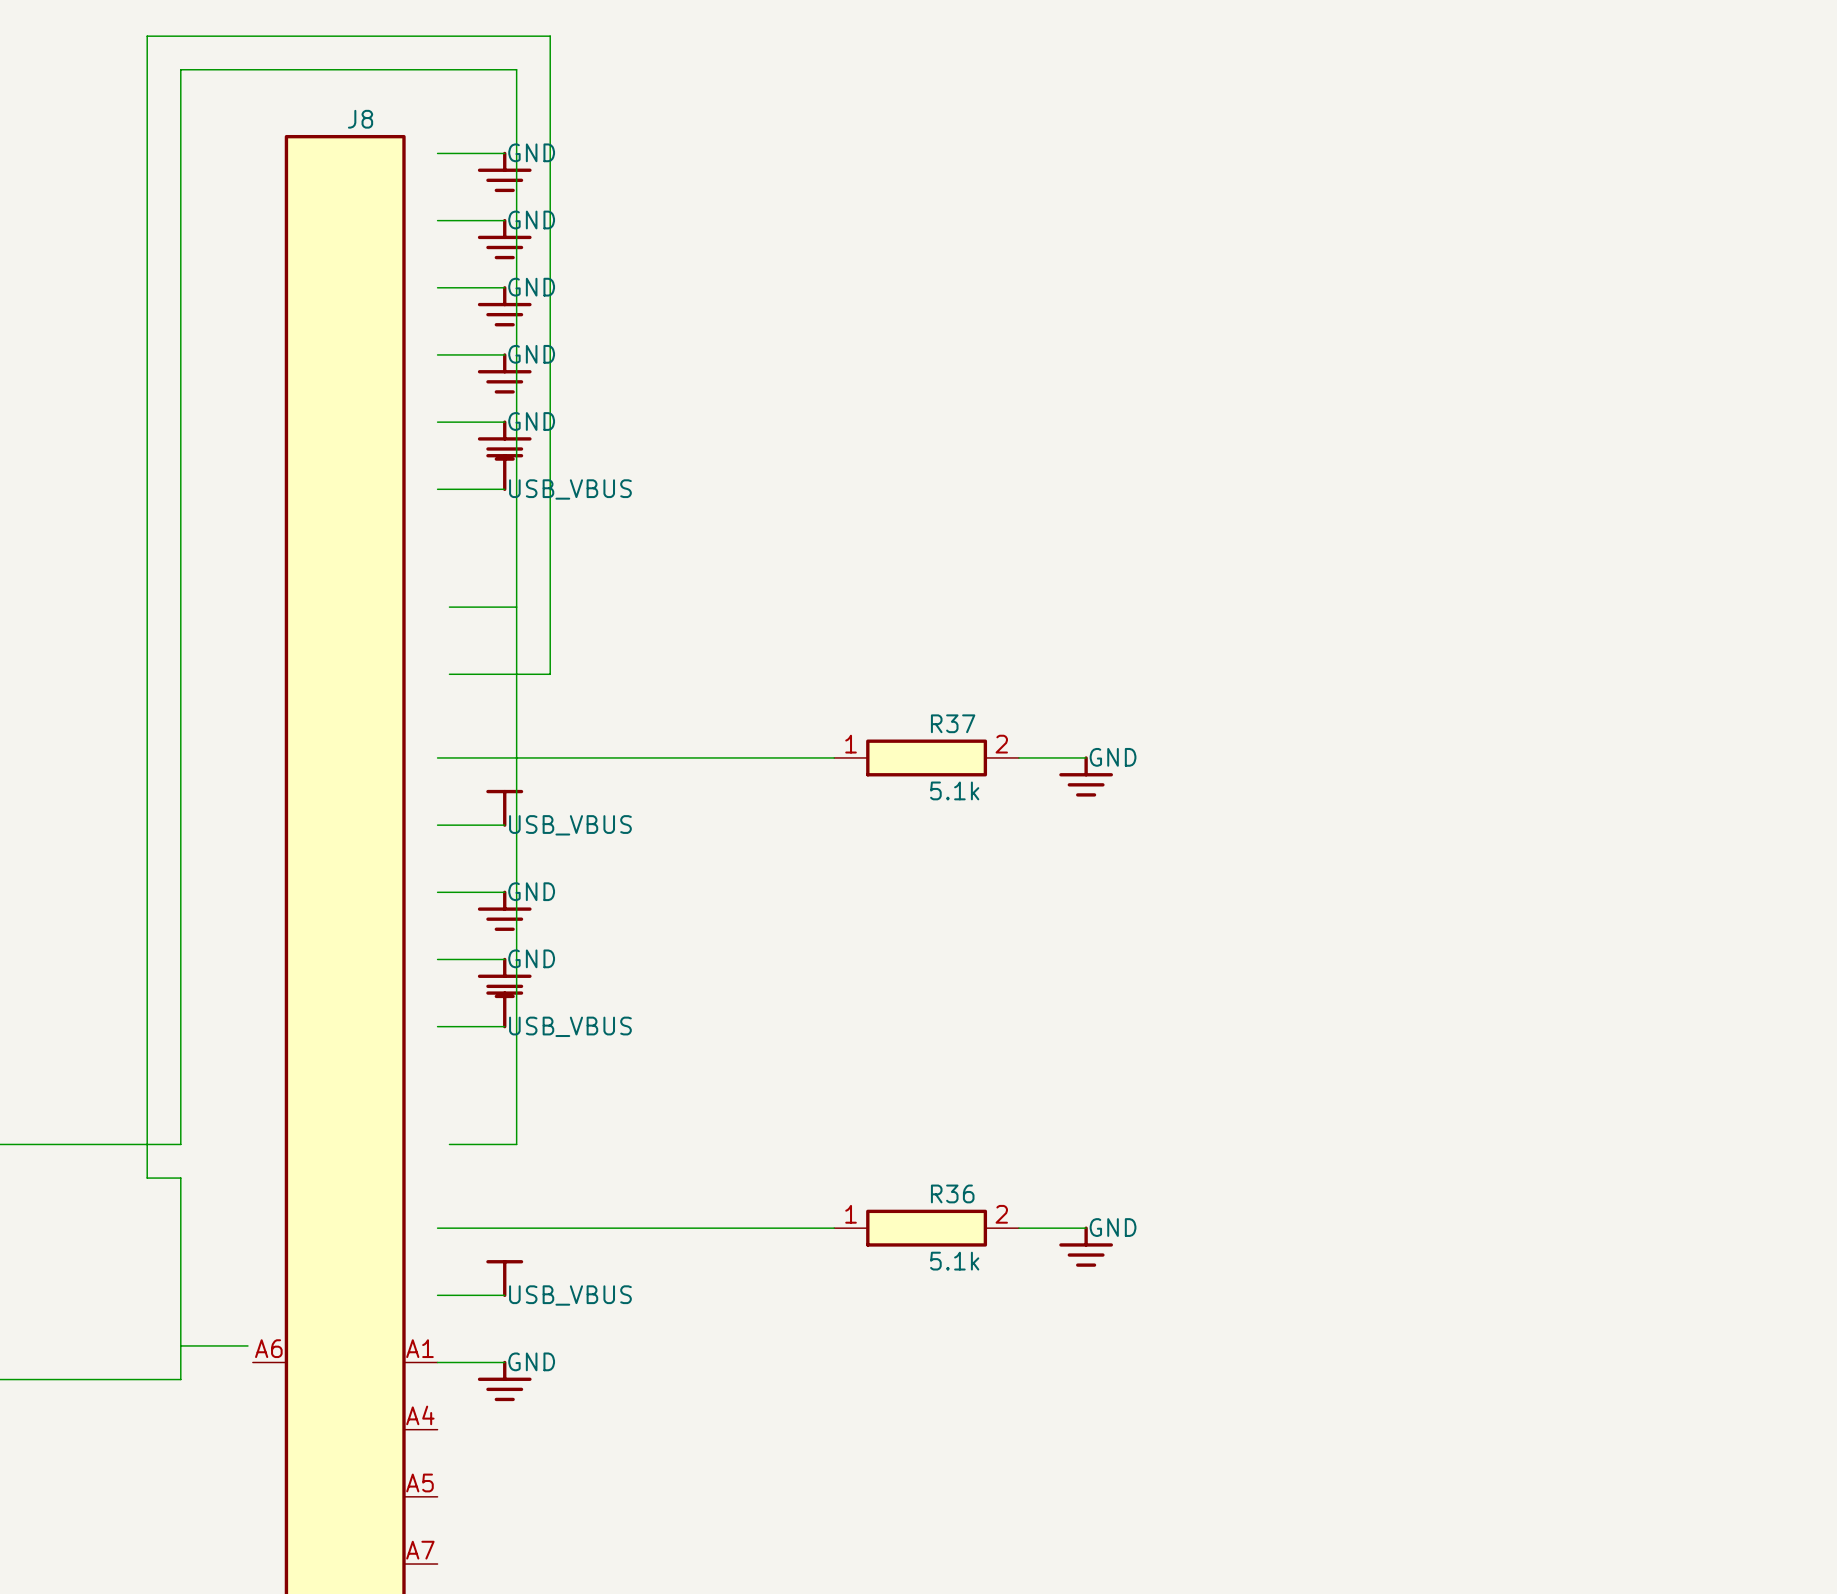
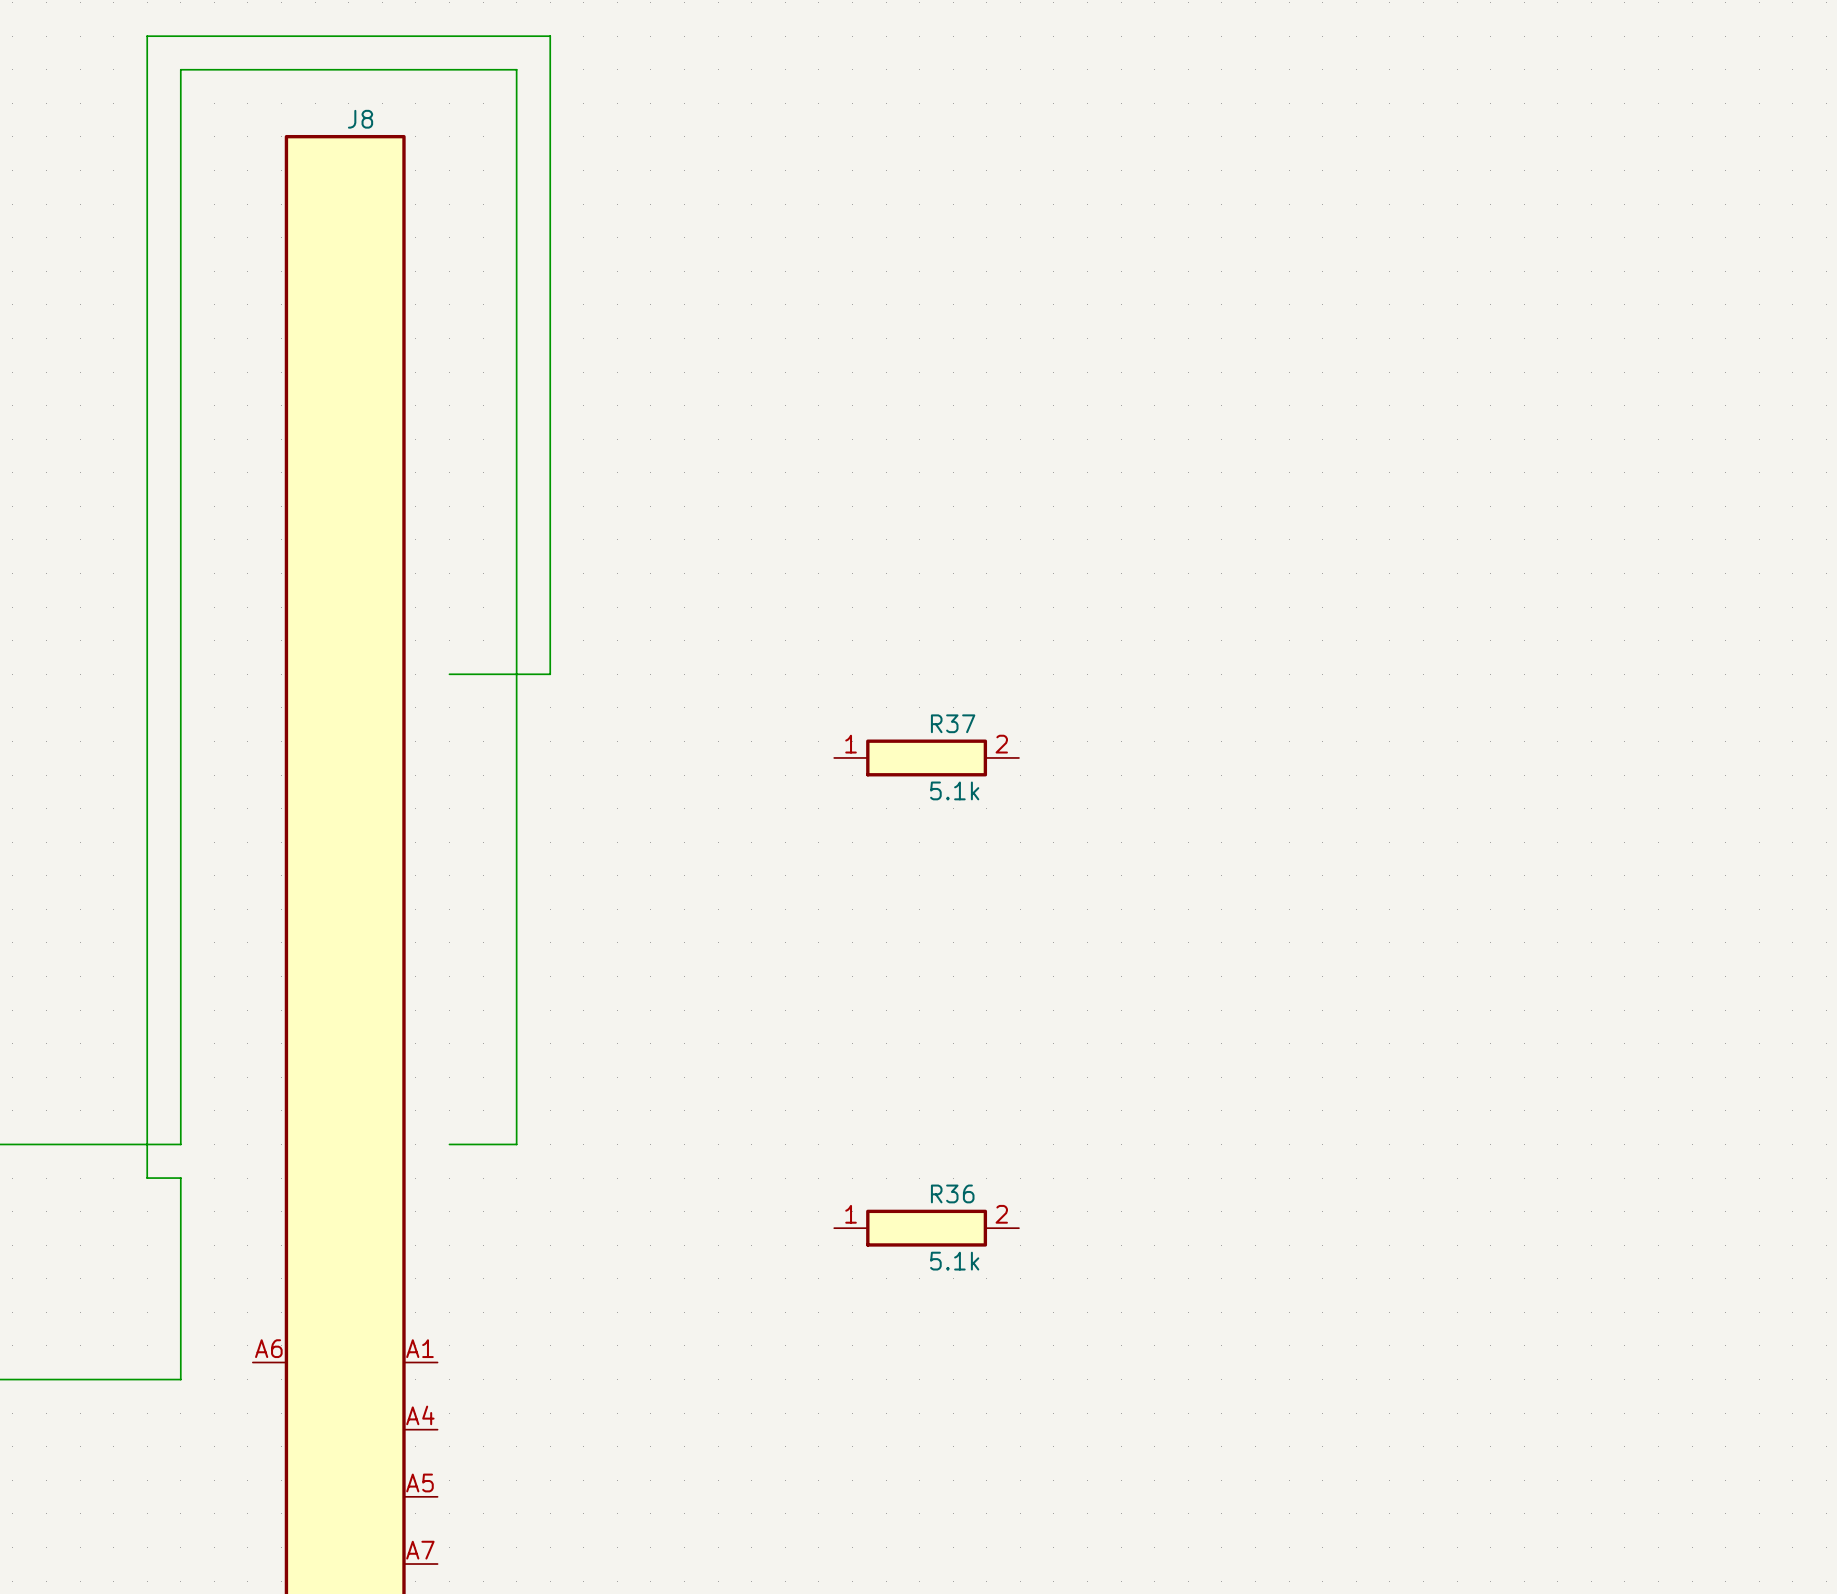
wire: (437, 153) (504, 153) -> none
power symbol: GND (504, 171) -> none
wire: (437, 220) (504, 220) -> none
power symbol: GND (504, 239) -> none
wire: (437, 287) (504, 287) -> none
power symbol: GND (504, 306) -> none
wire: (437, 354) (504, 354) -> none
power symbol: GND (504, 373) -> none
wire: (437, 422) (504, 422) -> none
power symbol: GND (504, 440) -> none
power symbol: USB_VBUS (504, 472) -> none
wire: (437, 489) (504, 489) -> none
wire: (449, 607) (516, 607) -> none
wire: (437, 757) (834, 757) -> none
wire: (1018, 757) (1086, 757) -> none
power symbol: GND (1086, 776) -> none
power symbol: USB_VBUS (504, 808) -> none
wire: (437, 825) (504, 825) -> none
wire: (437, 892) (504, 892) -> none
power symbol: GND (504, 910) -> none
wire: (437, 959) (504, 959) -> none
power symbol: GND (504, 977) -> none
power symbol: USB_VBUS (504, 1009) -> none
wire: (437, 1026) (504, 1026) -> none
wire: (437, 1228) (834, 1228) -> none
wire: (1018, 1228) (1086, 1228) -> none
power symbol: GND (1086, 1246) -> none
power symbol: USB_VBUS (504, 1278) -> none
wire: (437, 1295) (504, 1295) -> none
wire: (180, 1345) (247, 1345) -> none
wire: (437, 1362) (504, 1362) -> none
power symbol: GND (504, 1380) -> none

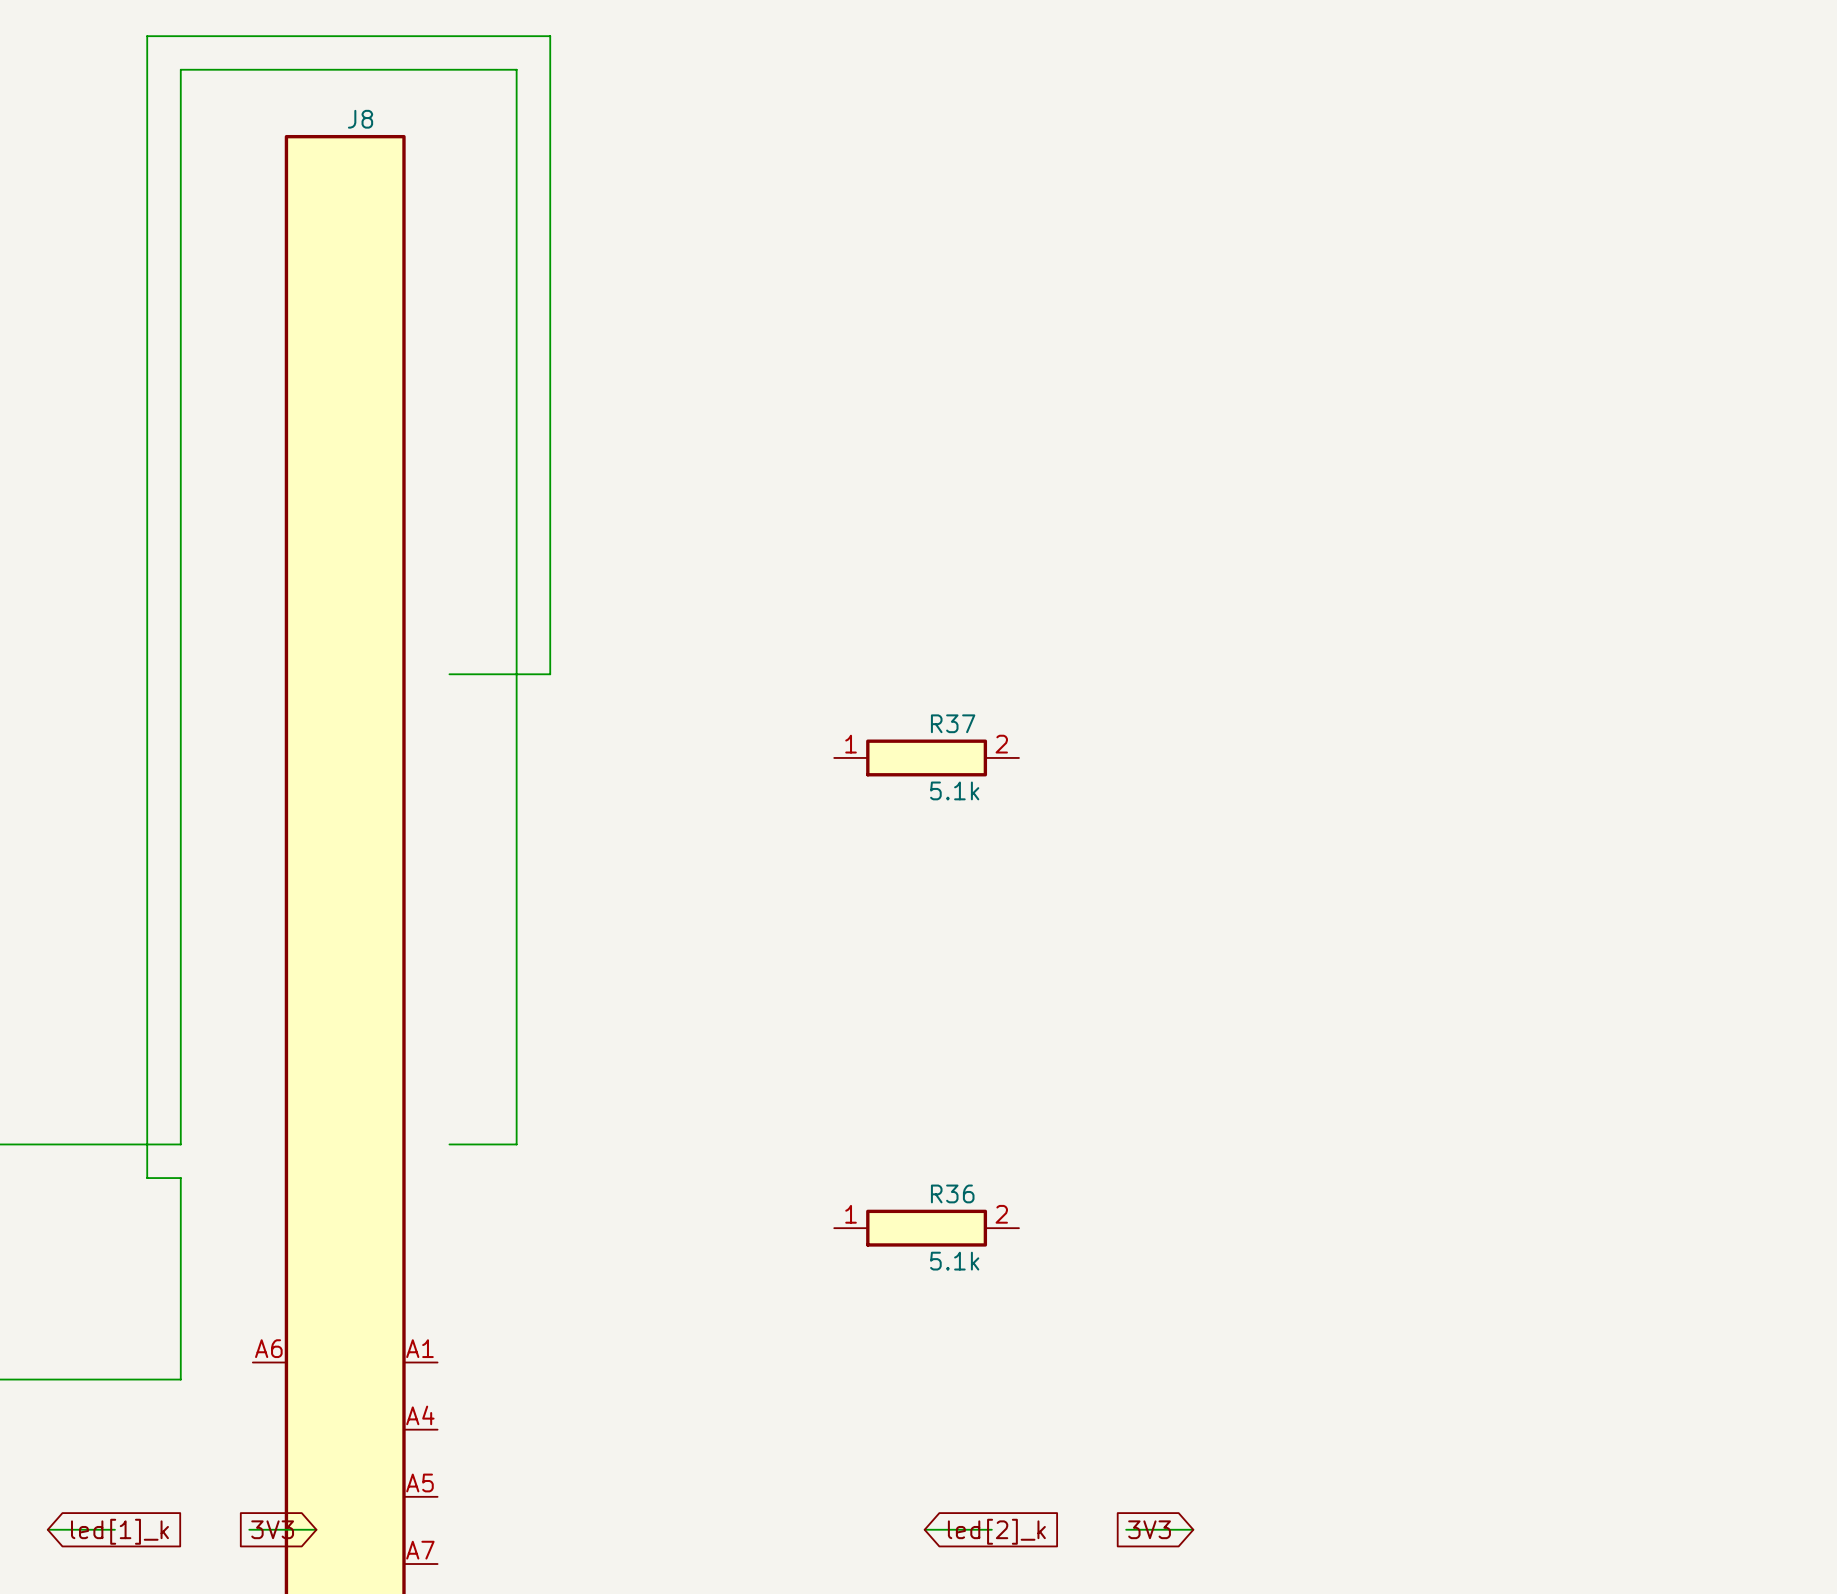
wire: none -> (47, 1529) (114, 1529)
wire: none -> (249, 1529) (316, 1529)
global label: none -> 3V3 (272, 1529)
wire: none -> (924, 1529) (991, 1529)
wire: none -> (1126, 1529) (1193, 1529)
global label: none -> 3V3 (1149, 1529)
global label: none -> led[1]_k (119, 1531)
global label: none -> led[2]_k (996, 1531)

